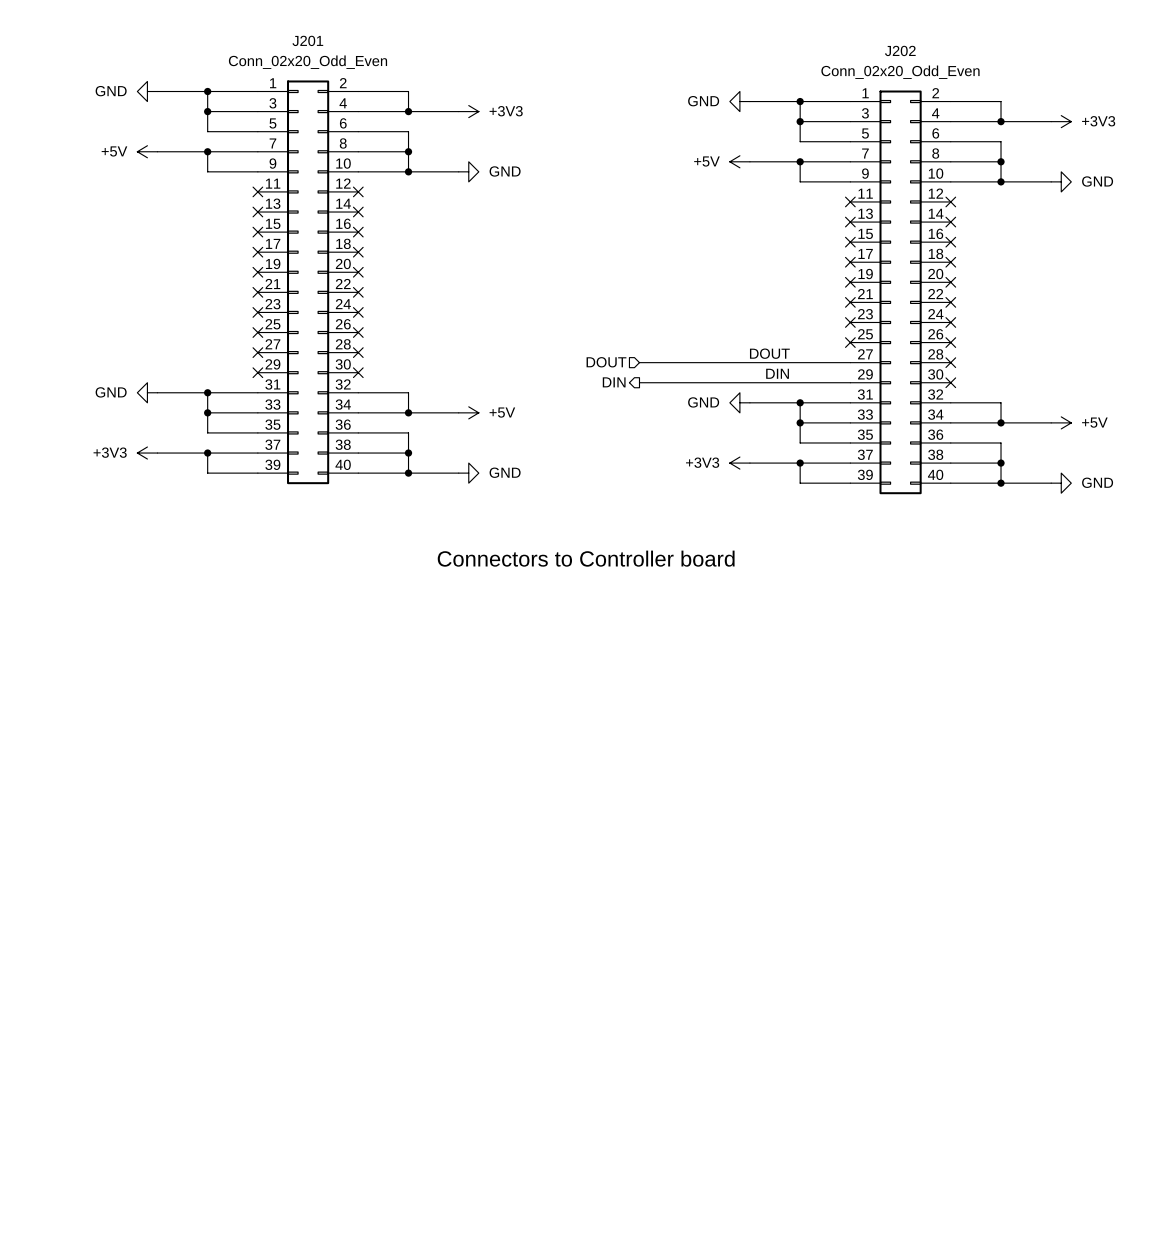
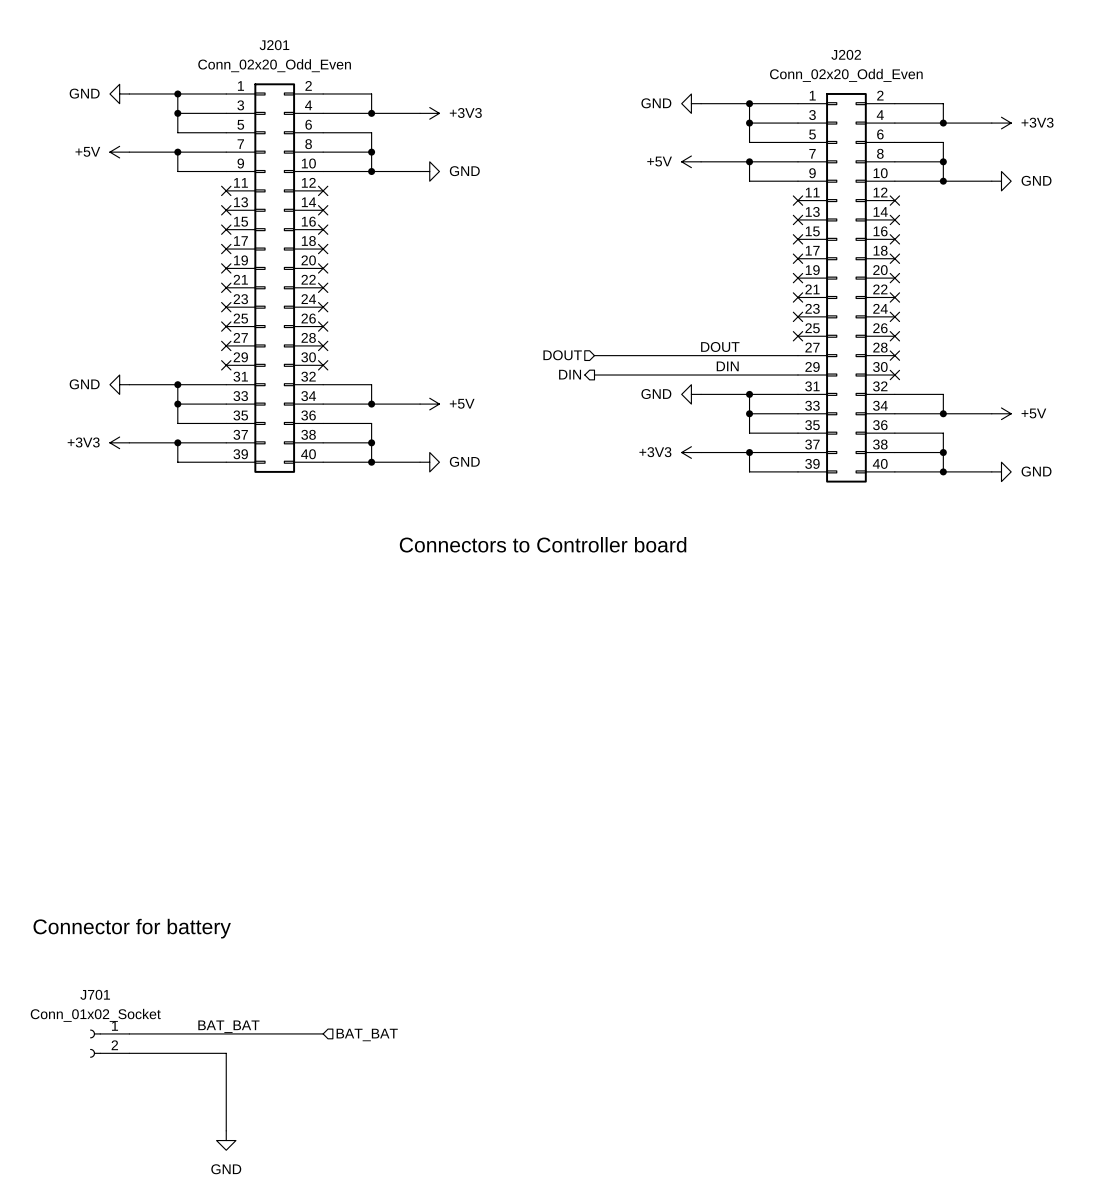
text: none -> Connector for battery (132, 928)
label: none -> BAT_BAT (228, 1026)
wire: none -> (129, 1033) (323, 1033)
hierarchical label: none -> BAT_BAT (367, 1034)
J701: none -> Conn_01x02_Socket (109, 1043)
wire: none -> (129, 1053) (226, 1053) (226, 1130)
power symbol: none -> GND (226, 1140)

